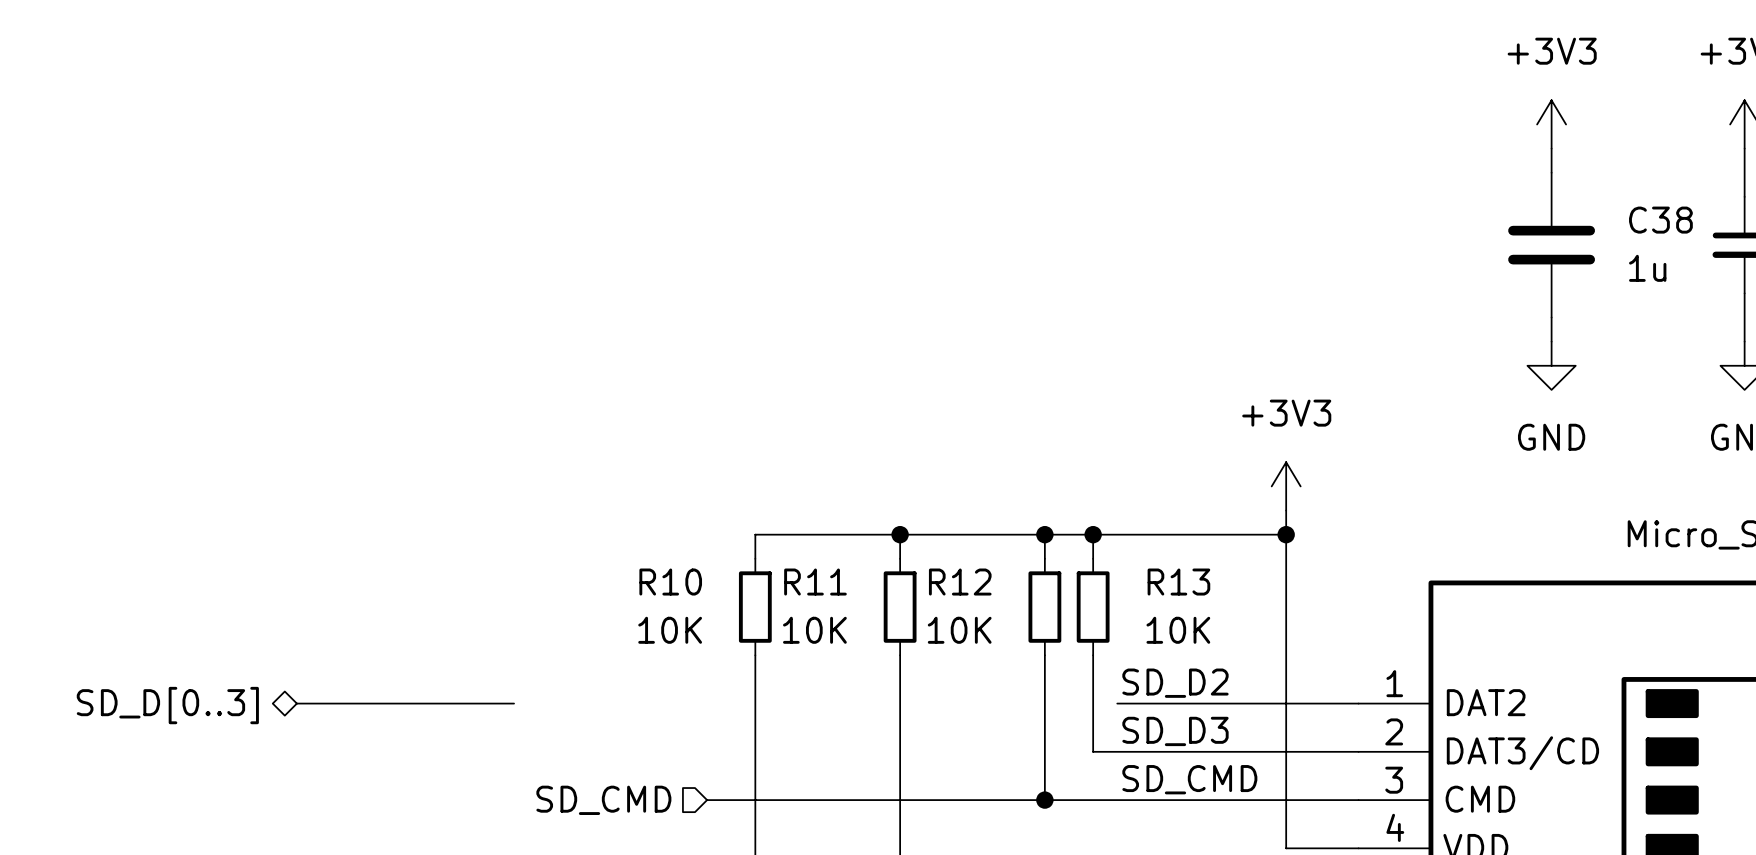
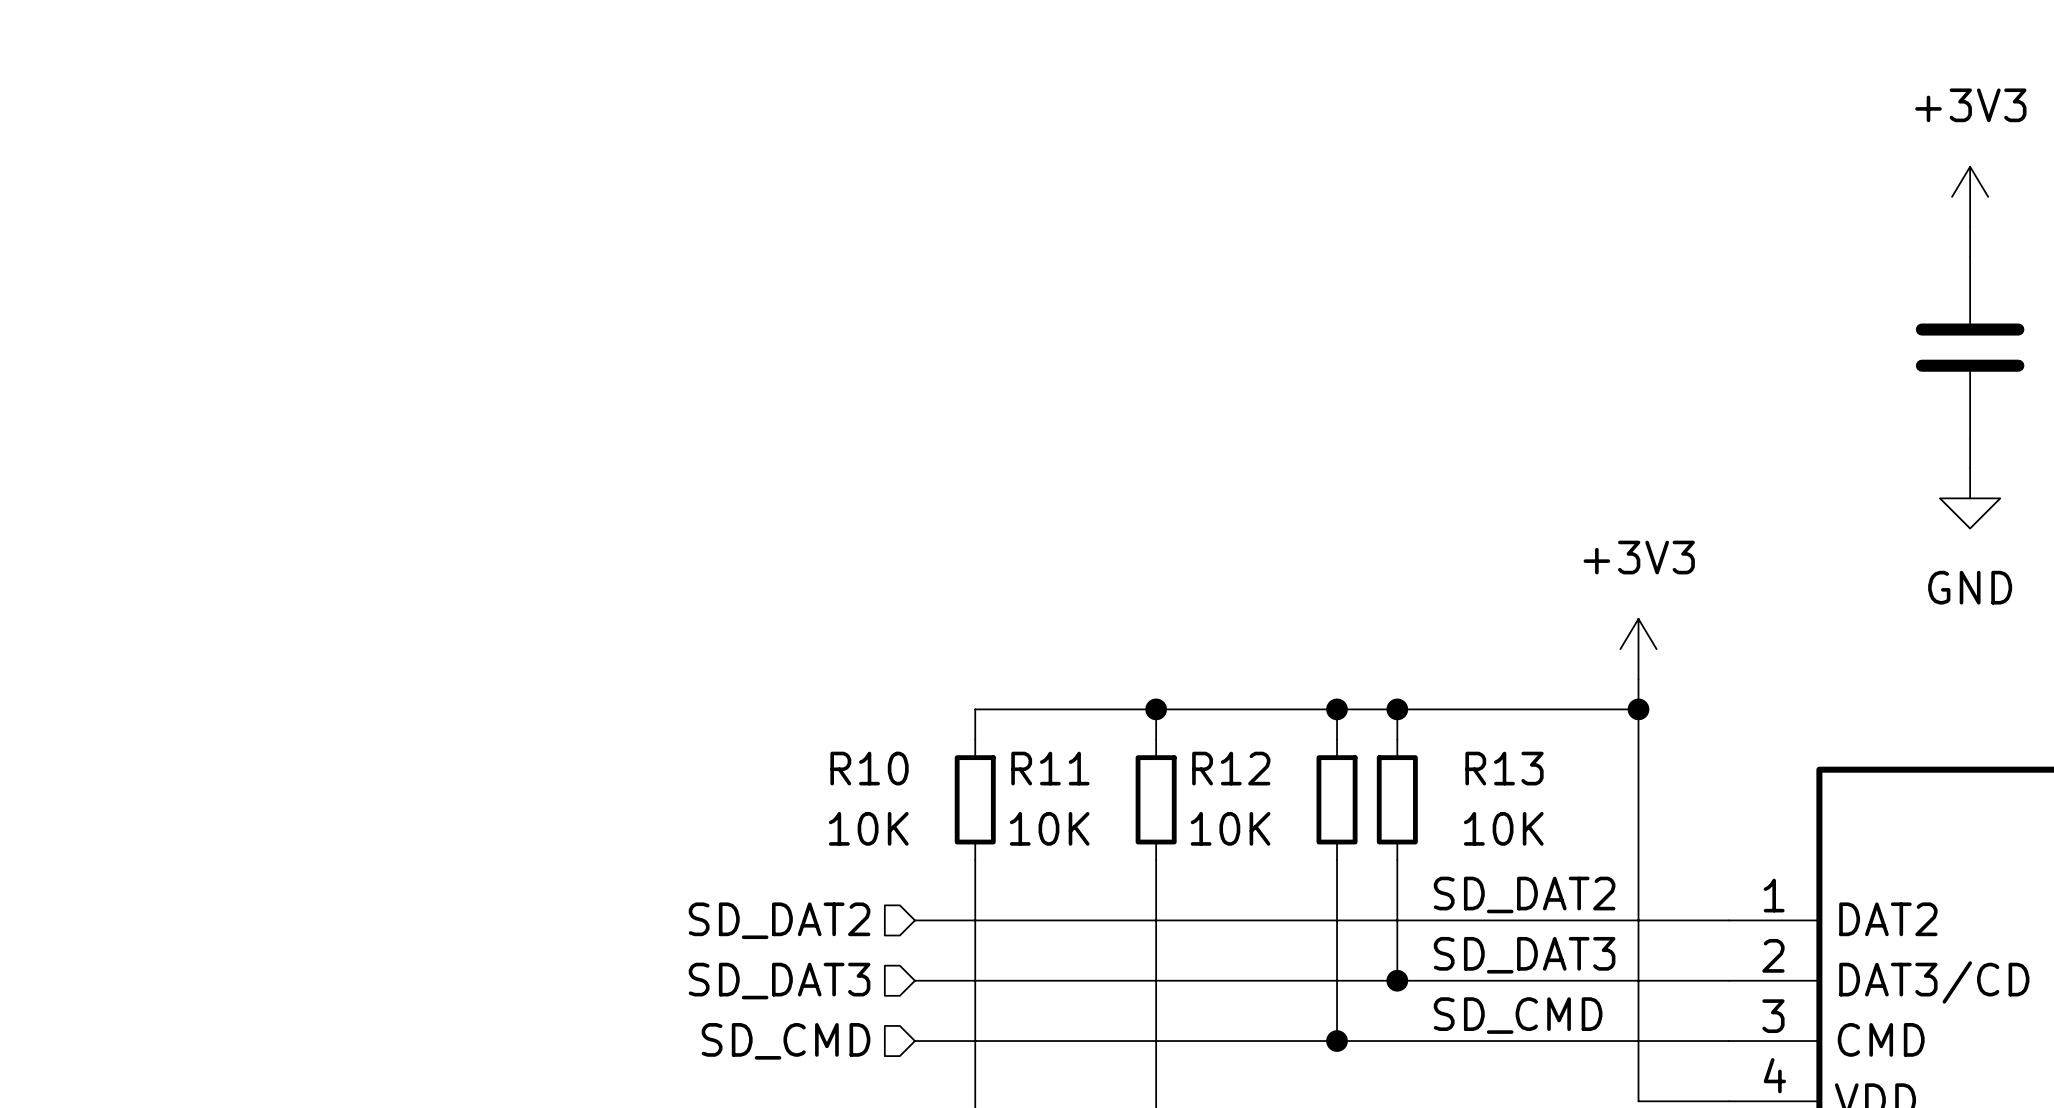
label: SD_D2 (1175, 683) -> SD_DAT2 (1524, 894)
bus: (296, 703) (514, 703) -> none
hierarchical label: none -> SD_DAT2 (779, 920)
wire: none -> (914, 920) (1427, 920)
hierarchical label: SD_D[0..3] (167, 705) -> none
label: SD_D3 (1175, 731) -> SD_DAT3 (1524, 955)
wire: none -> (914, 980) (1397, 980)
junction: none -> (1397, 980)
hierarchical label: none -> SD_DAT3 (779, 981)

